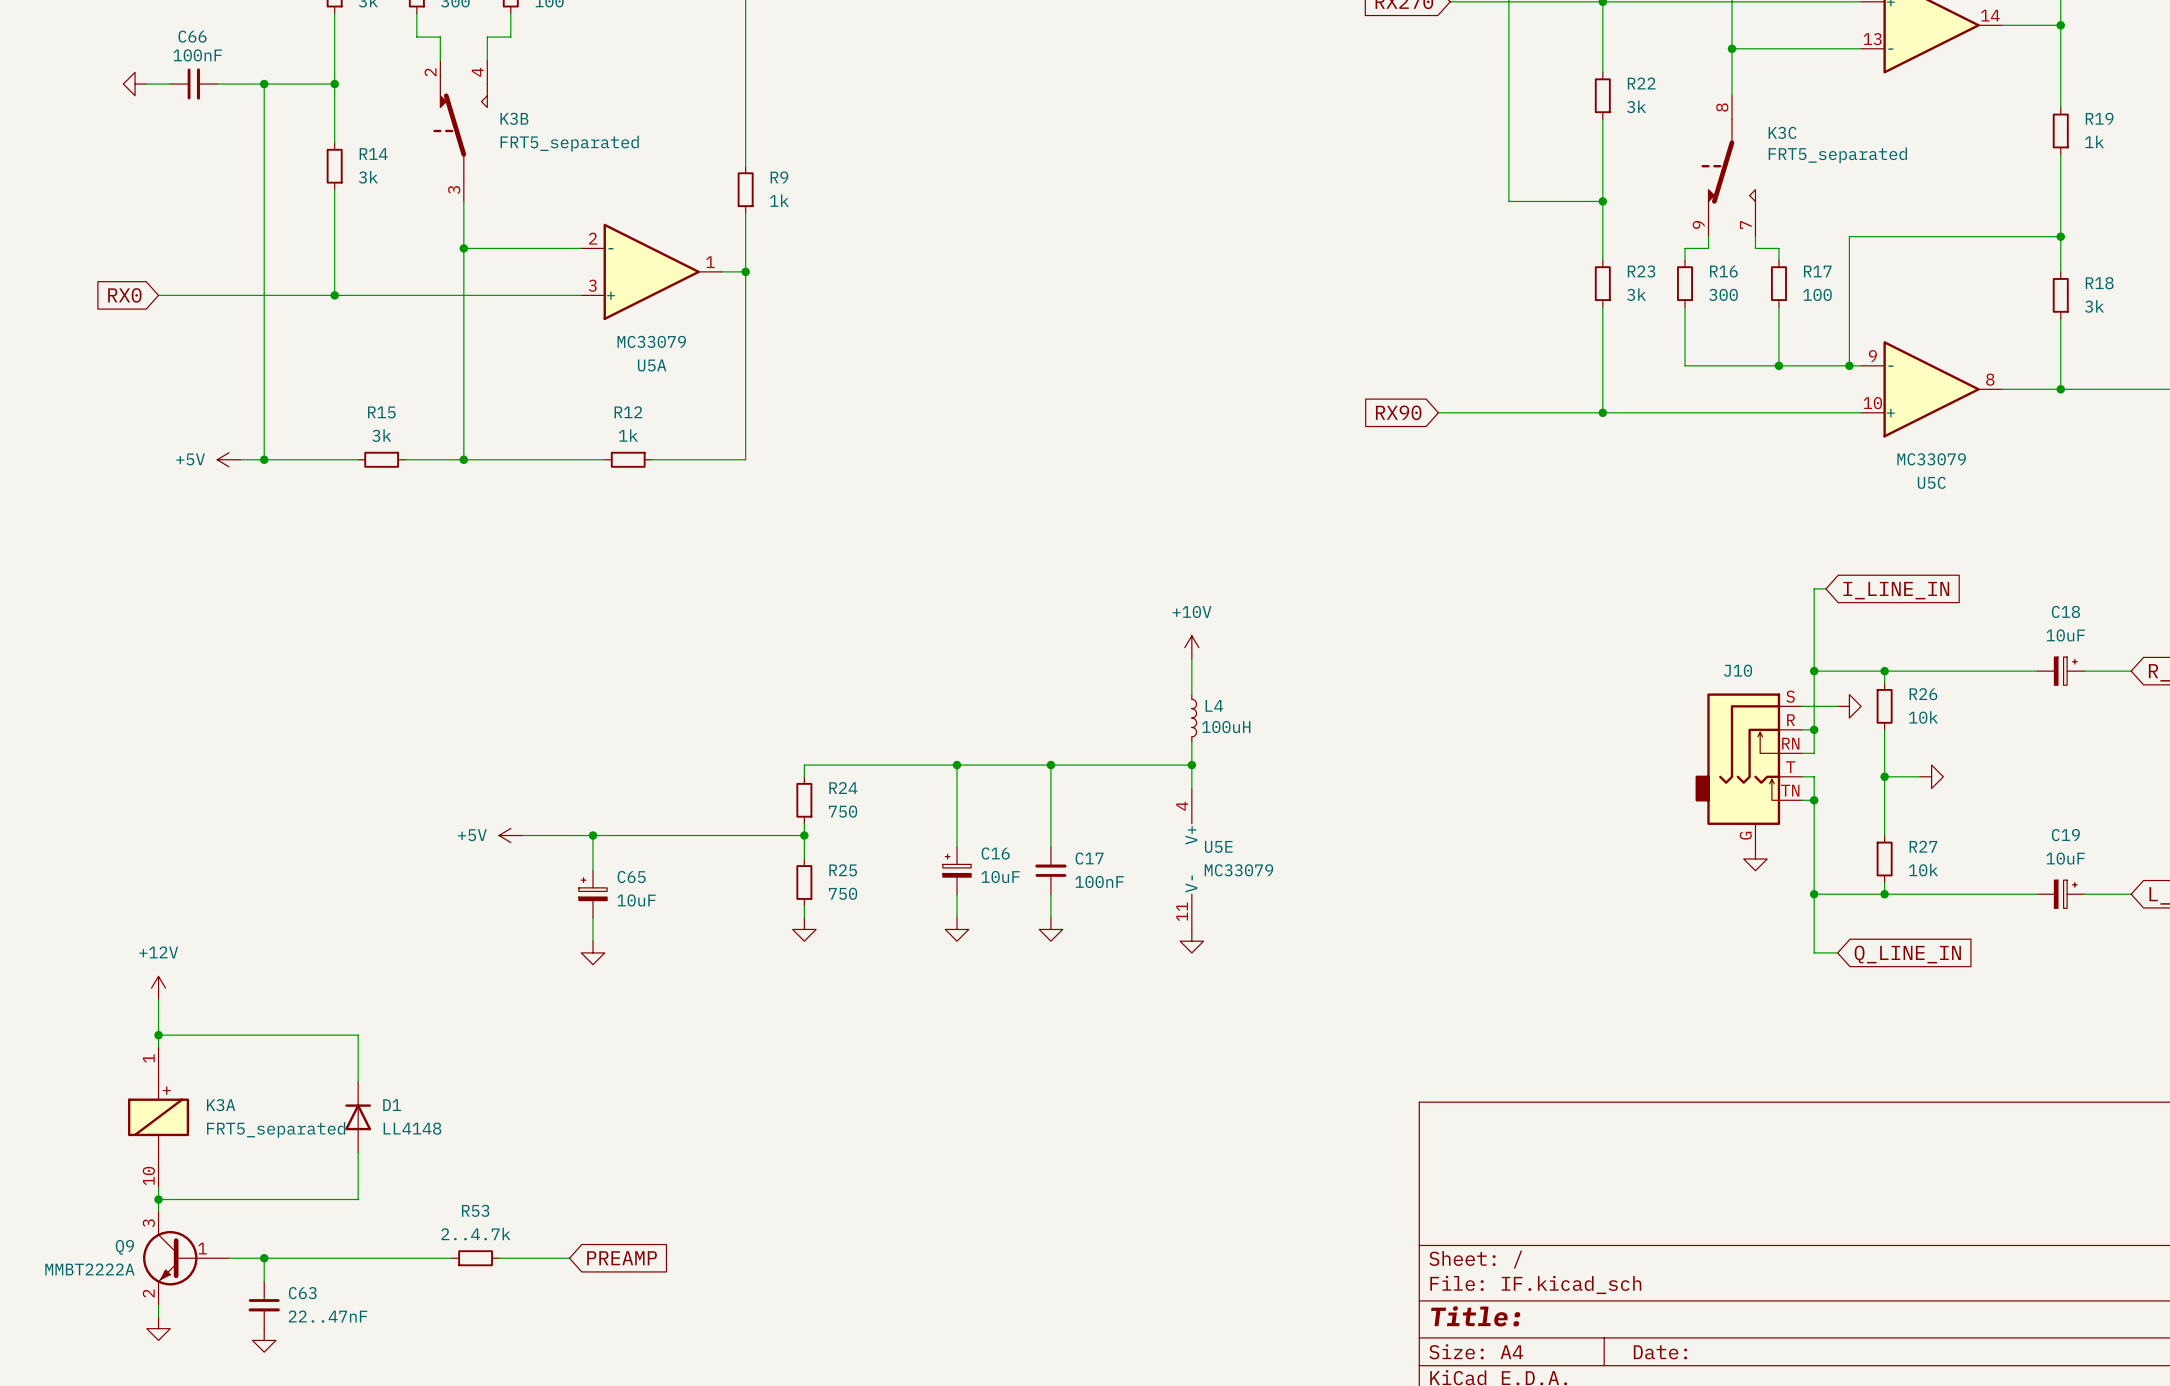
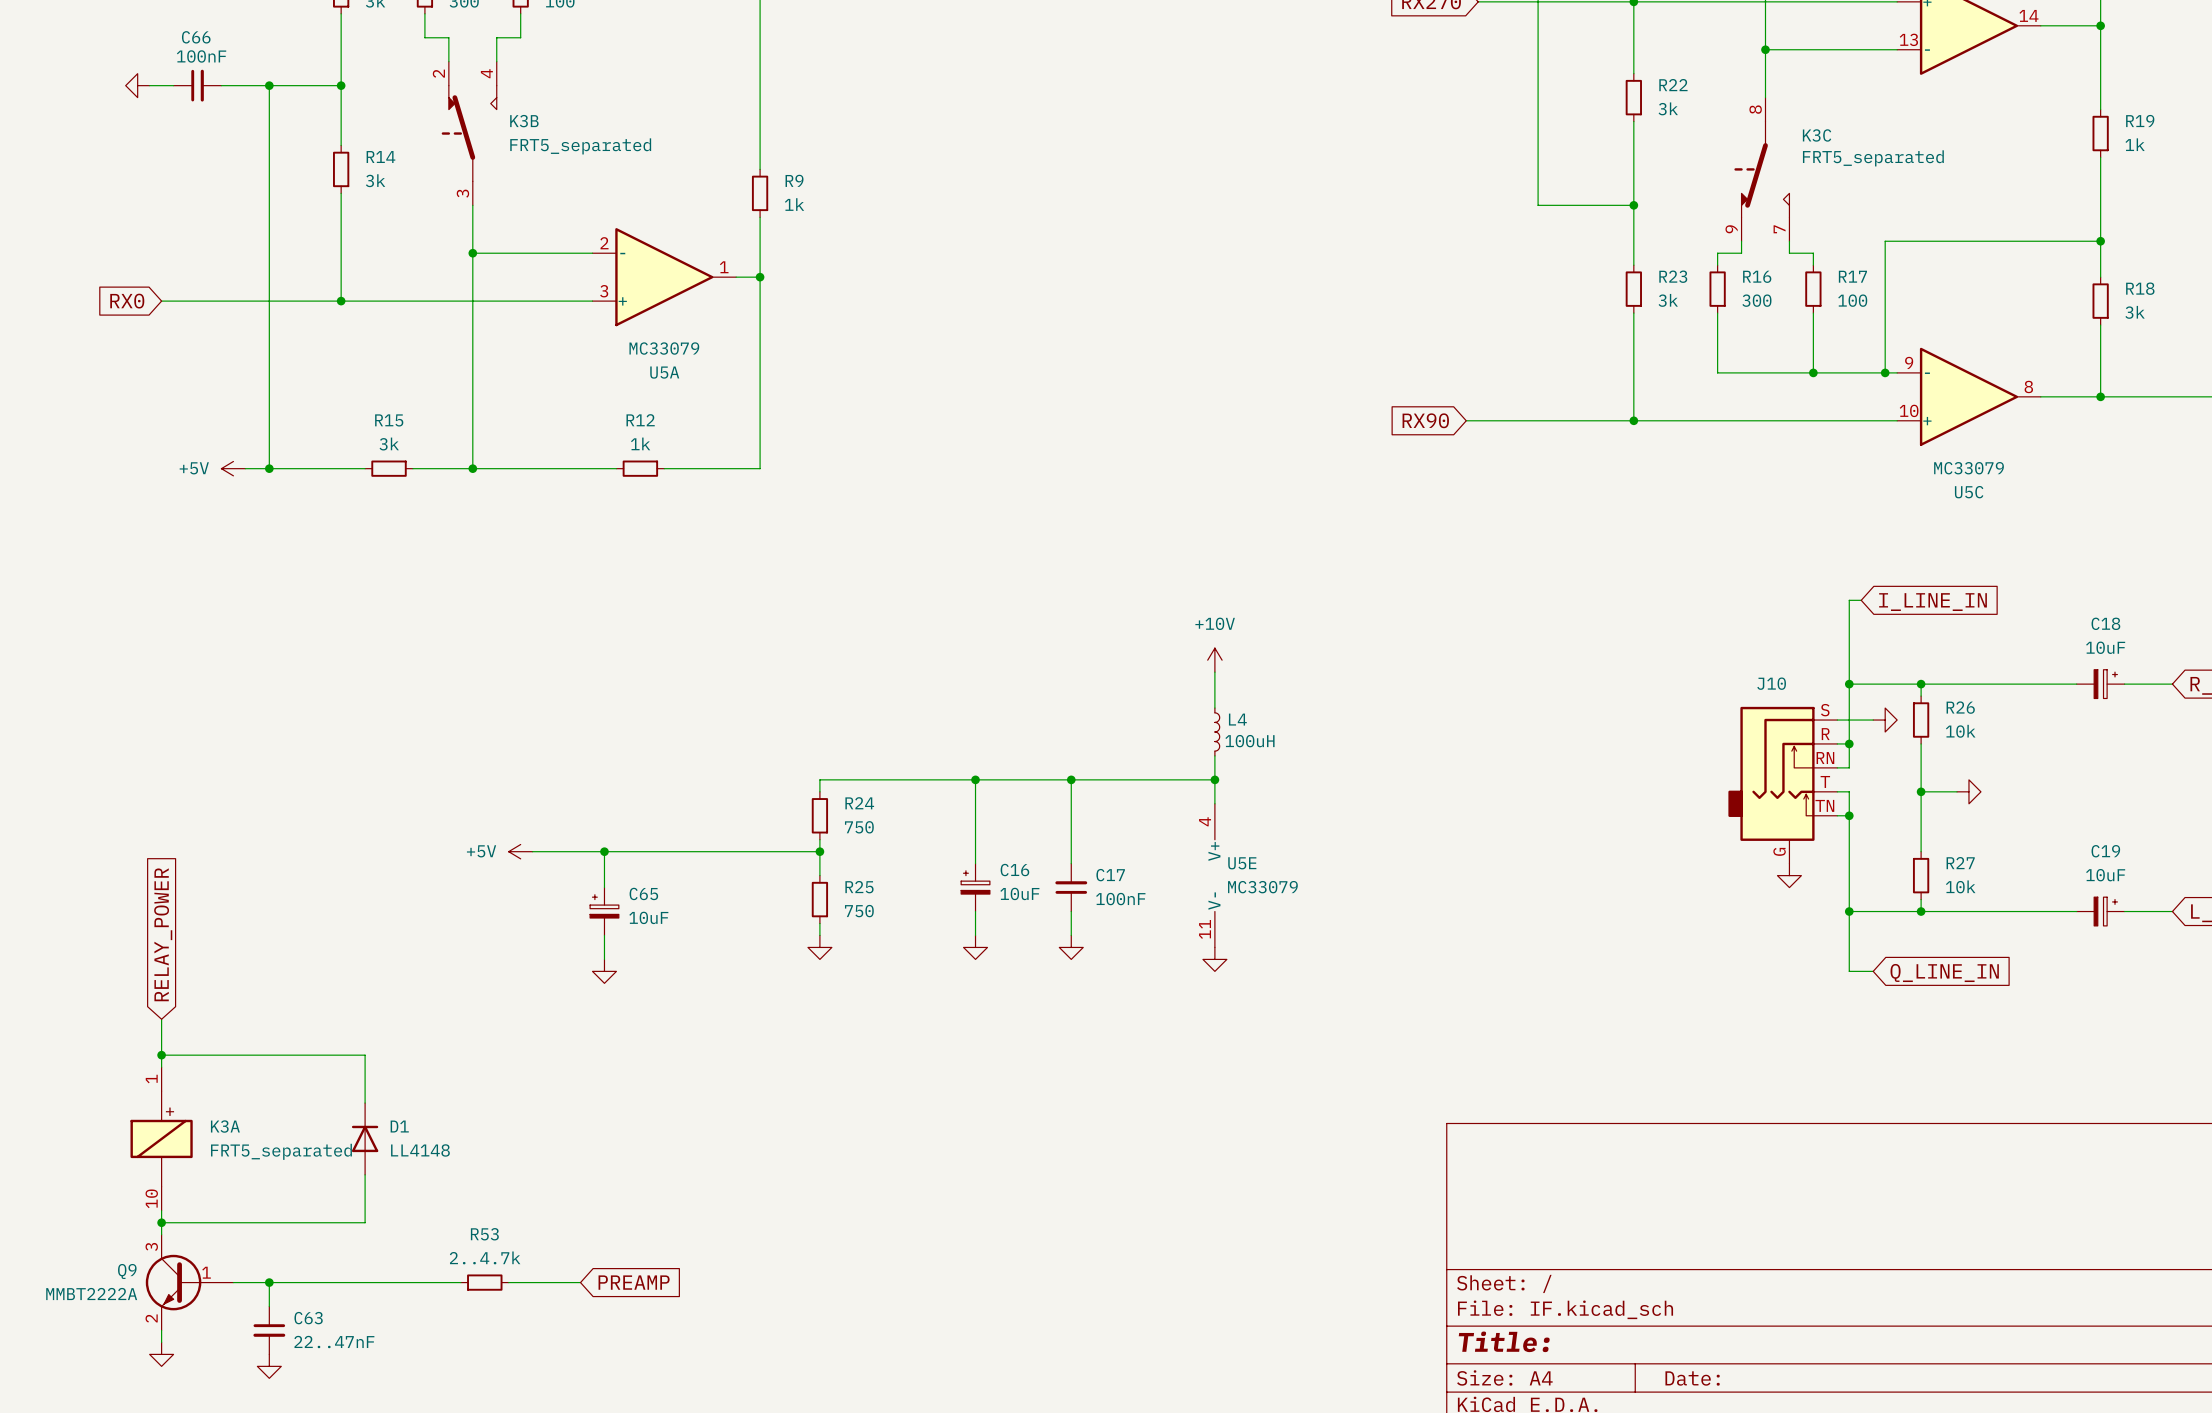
global label: none -> RELAY_POWER (163, 934)
power symbol: +12V (158, 988) -> none

